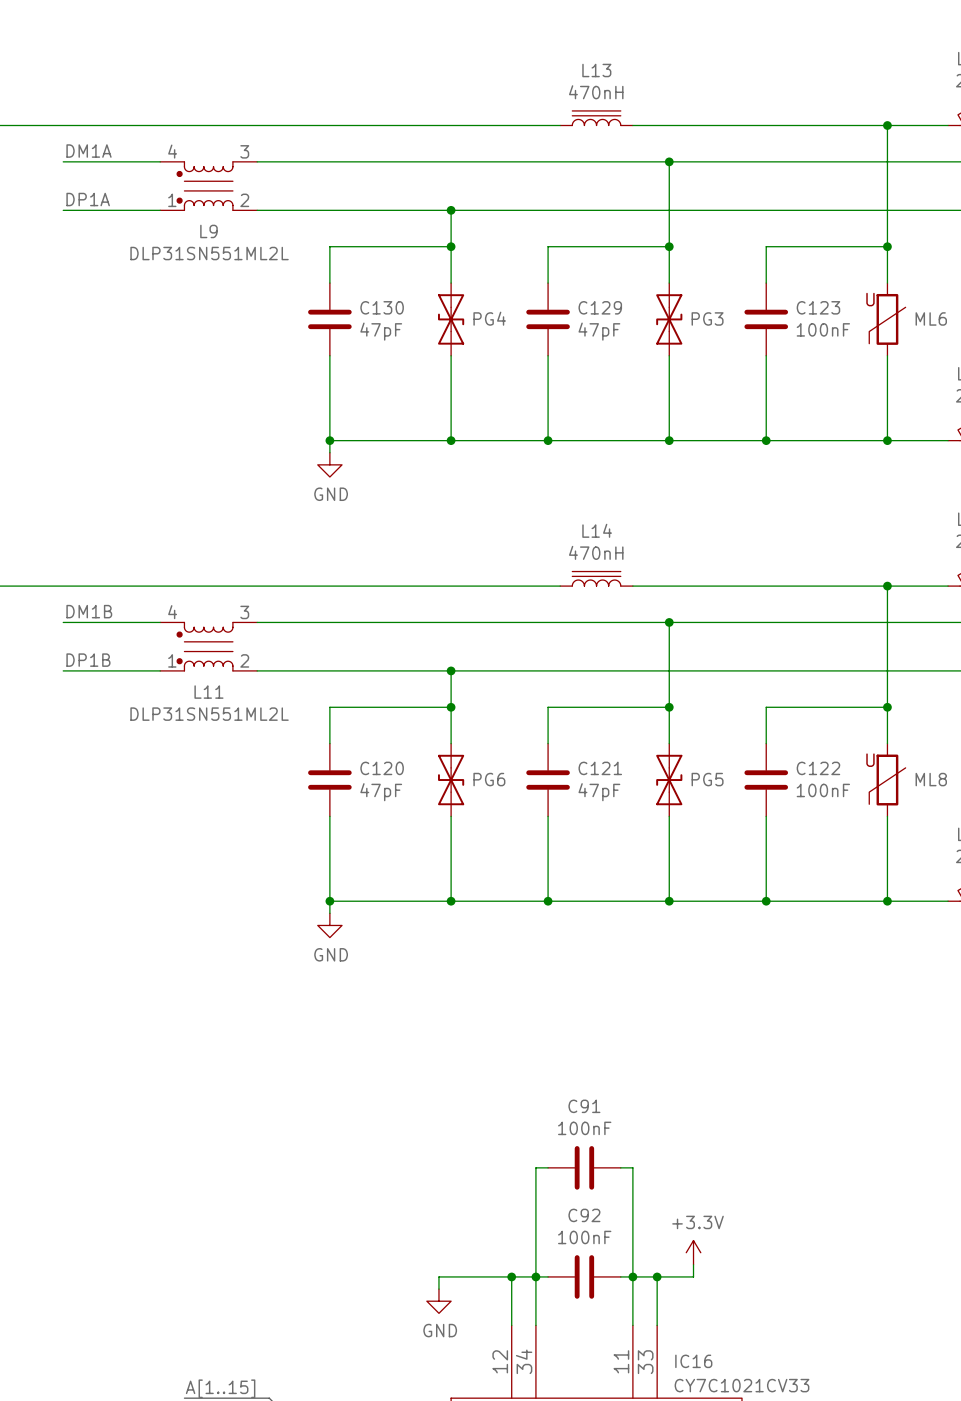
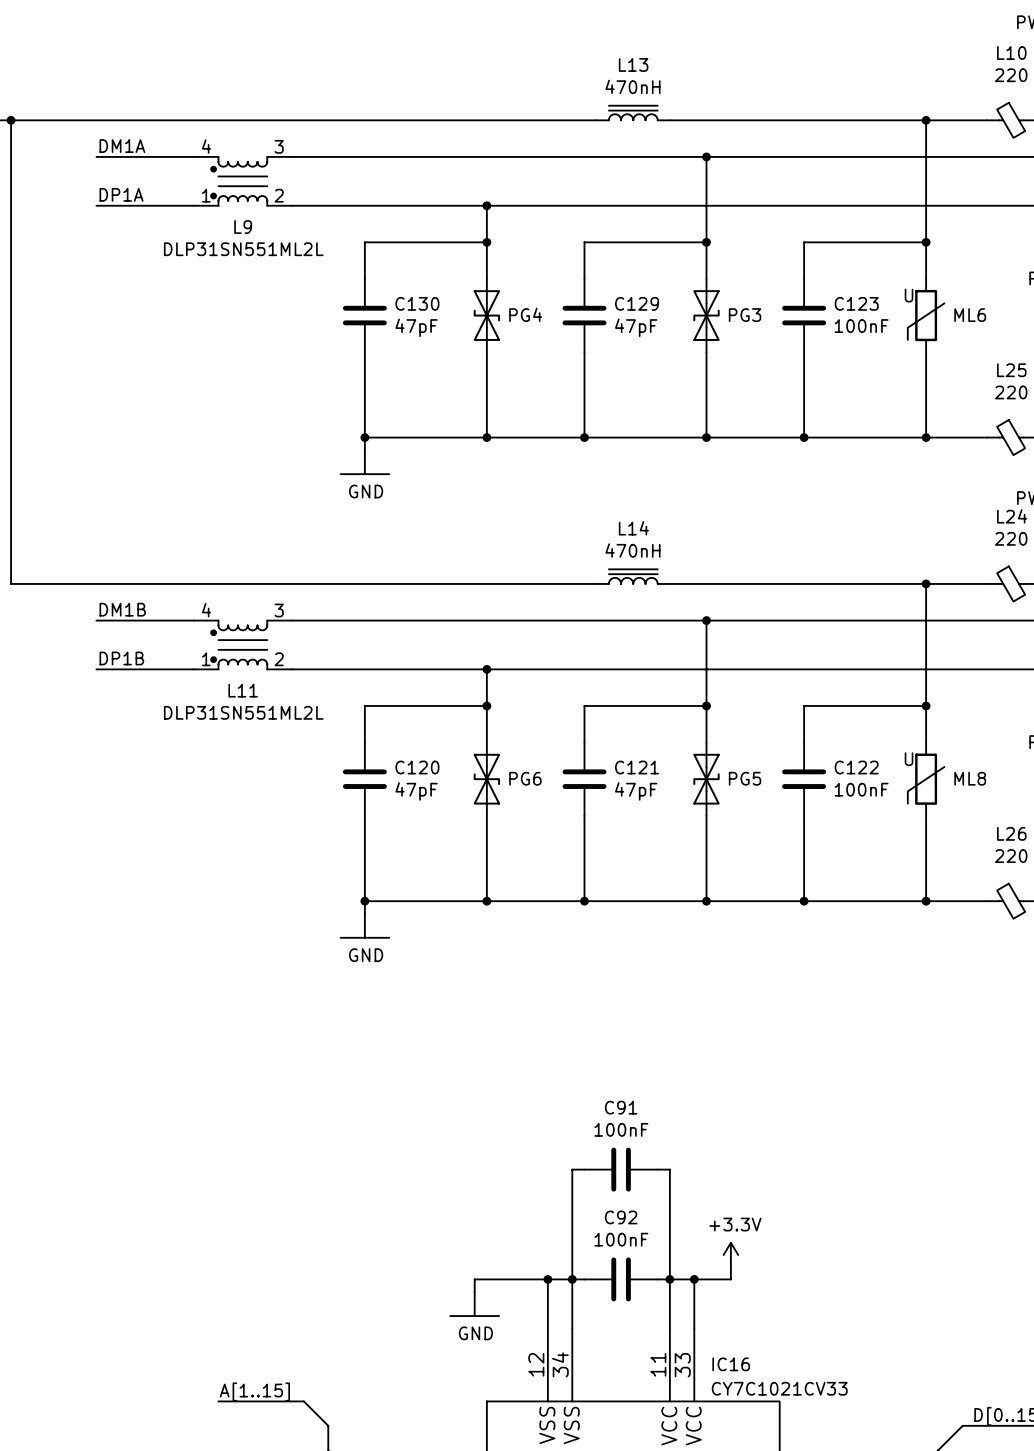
power symbol shape: [317, 452, 343, 478] -> [340, 449, 390, 475]
power symbol shape: [317, 913, 343, 938] -> [340, 913, 390, 938]
power symbol shape: [426, 1289, 452, 1314] -> [450, 1291, 500, 1317]

